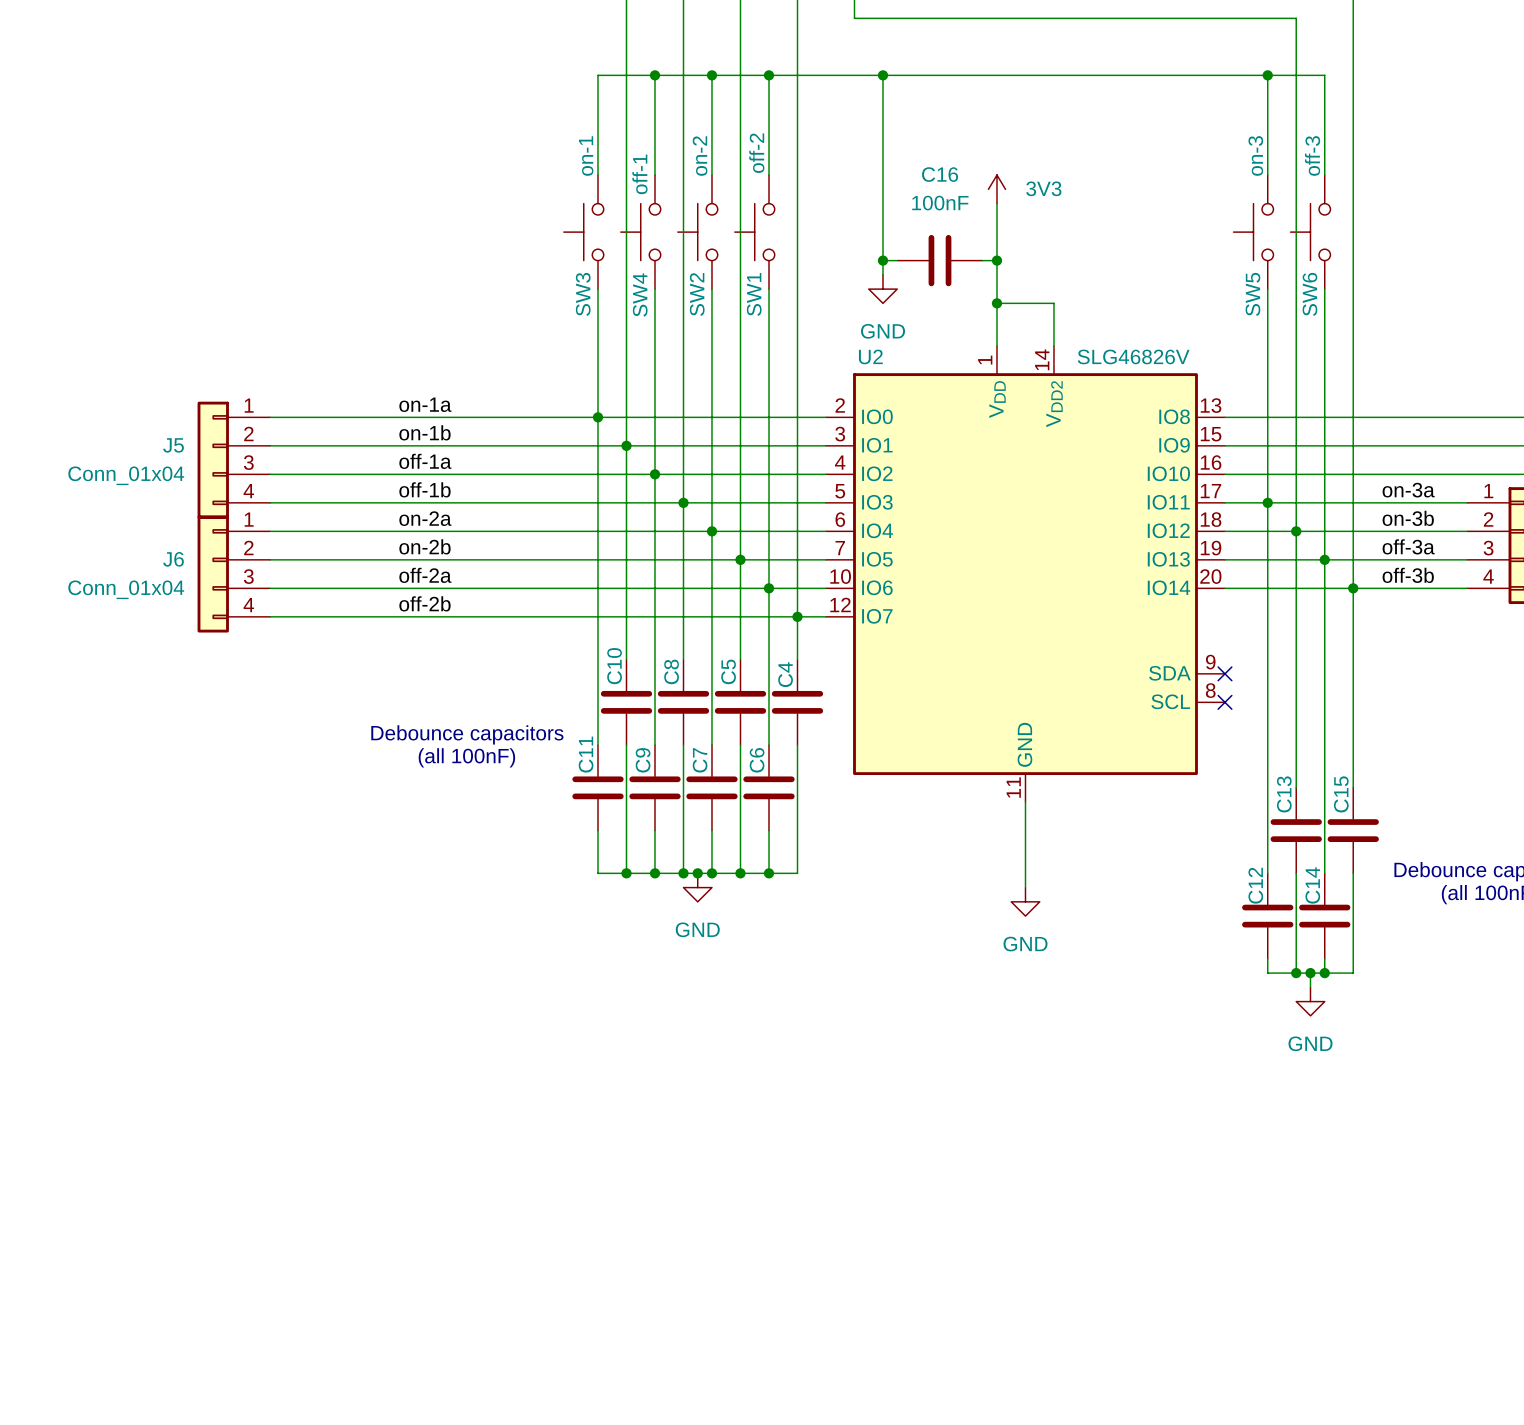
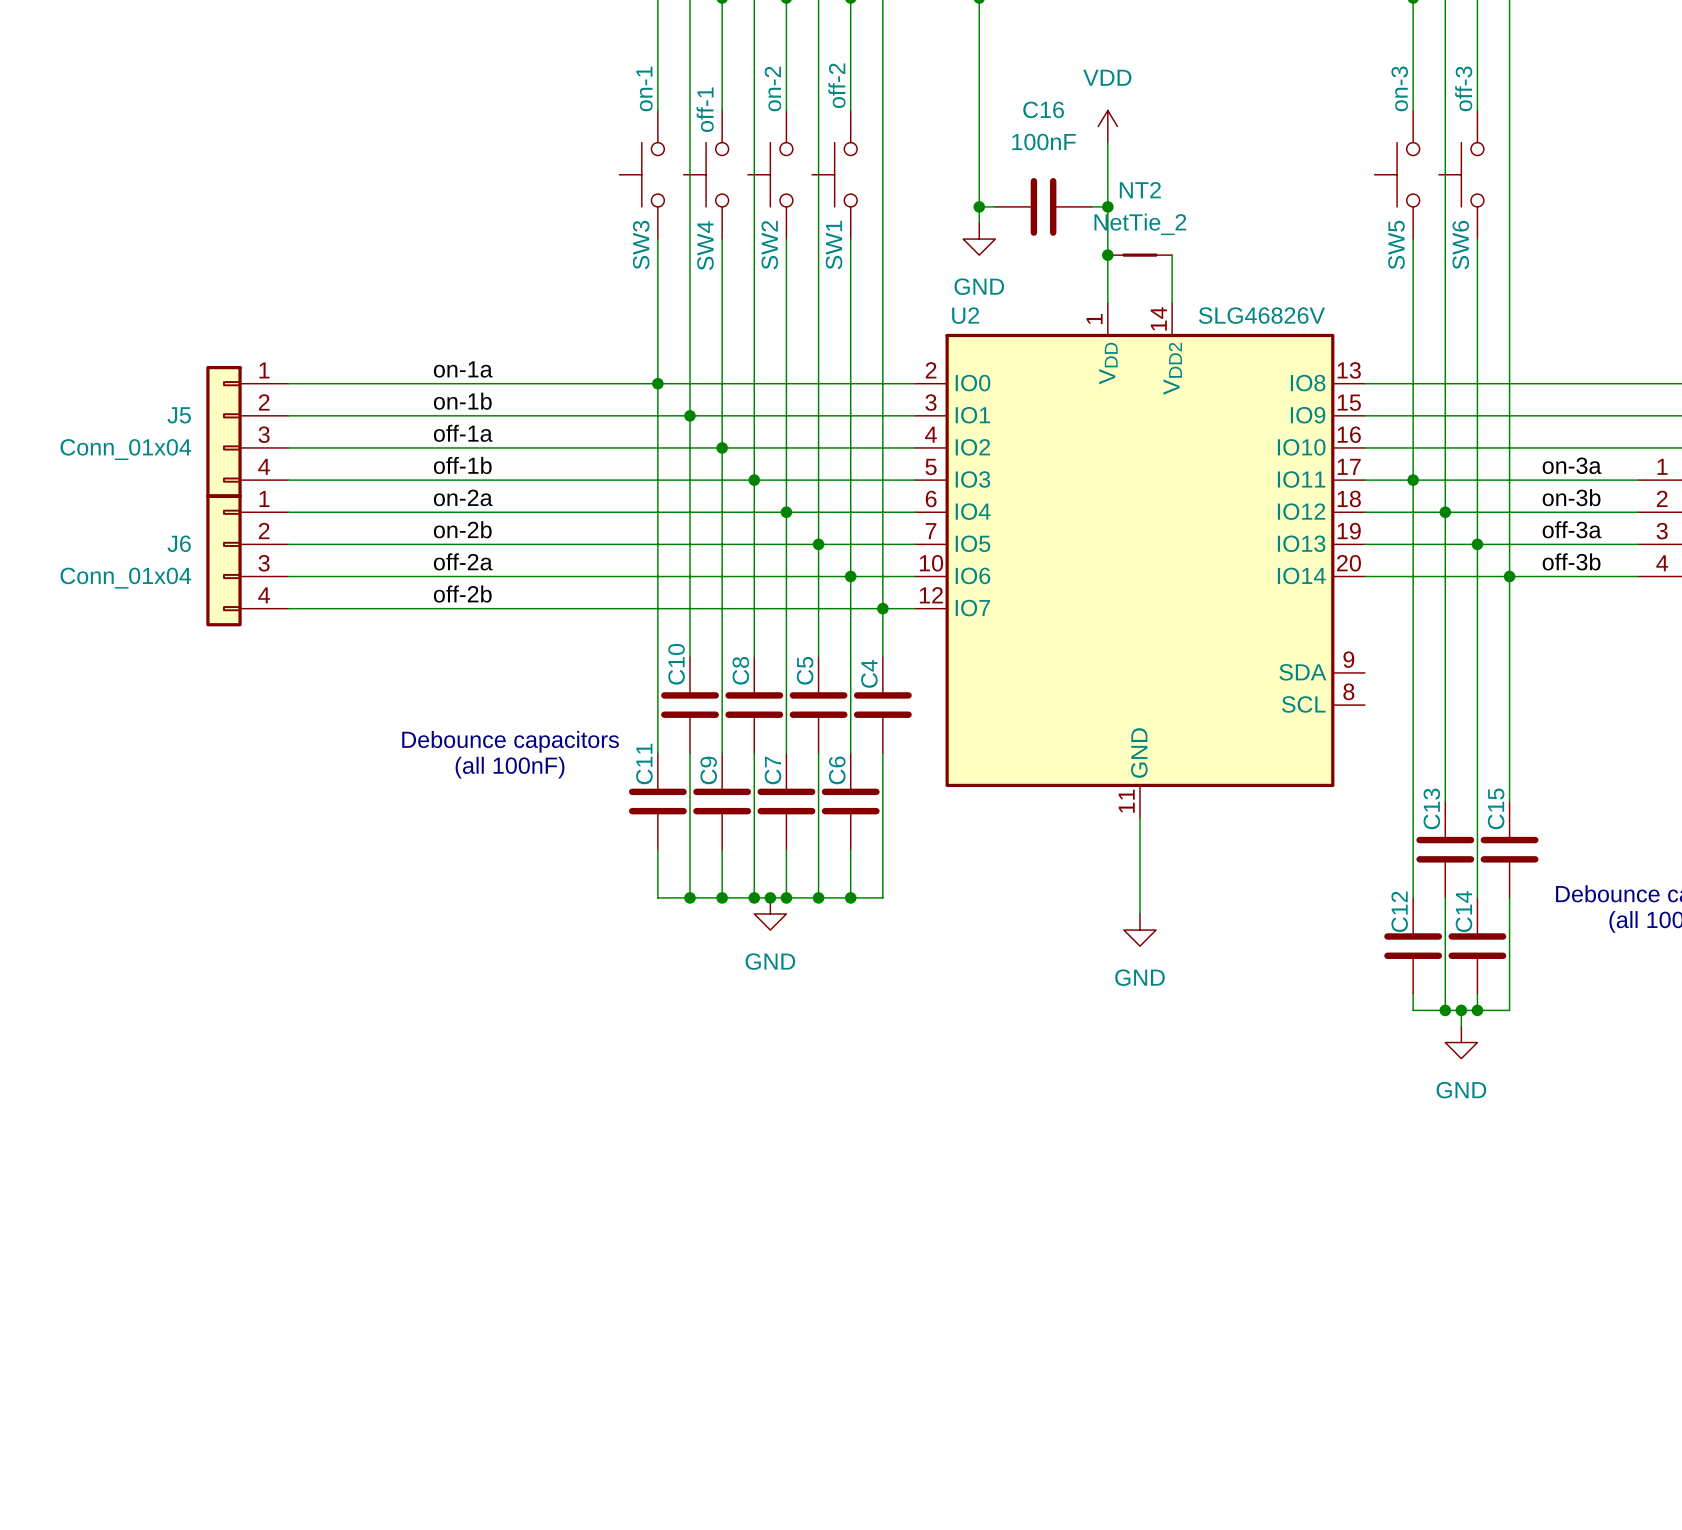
power symbol: 3V3 (996, 189) -> VDD (1107, 126)
NT2: none -> NetTie_2 (1139, 255)
no-connect mark: (1224, 673) -> none
no-connect mark: (1224, 702) -> none

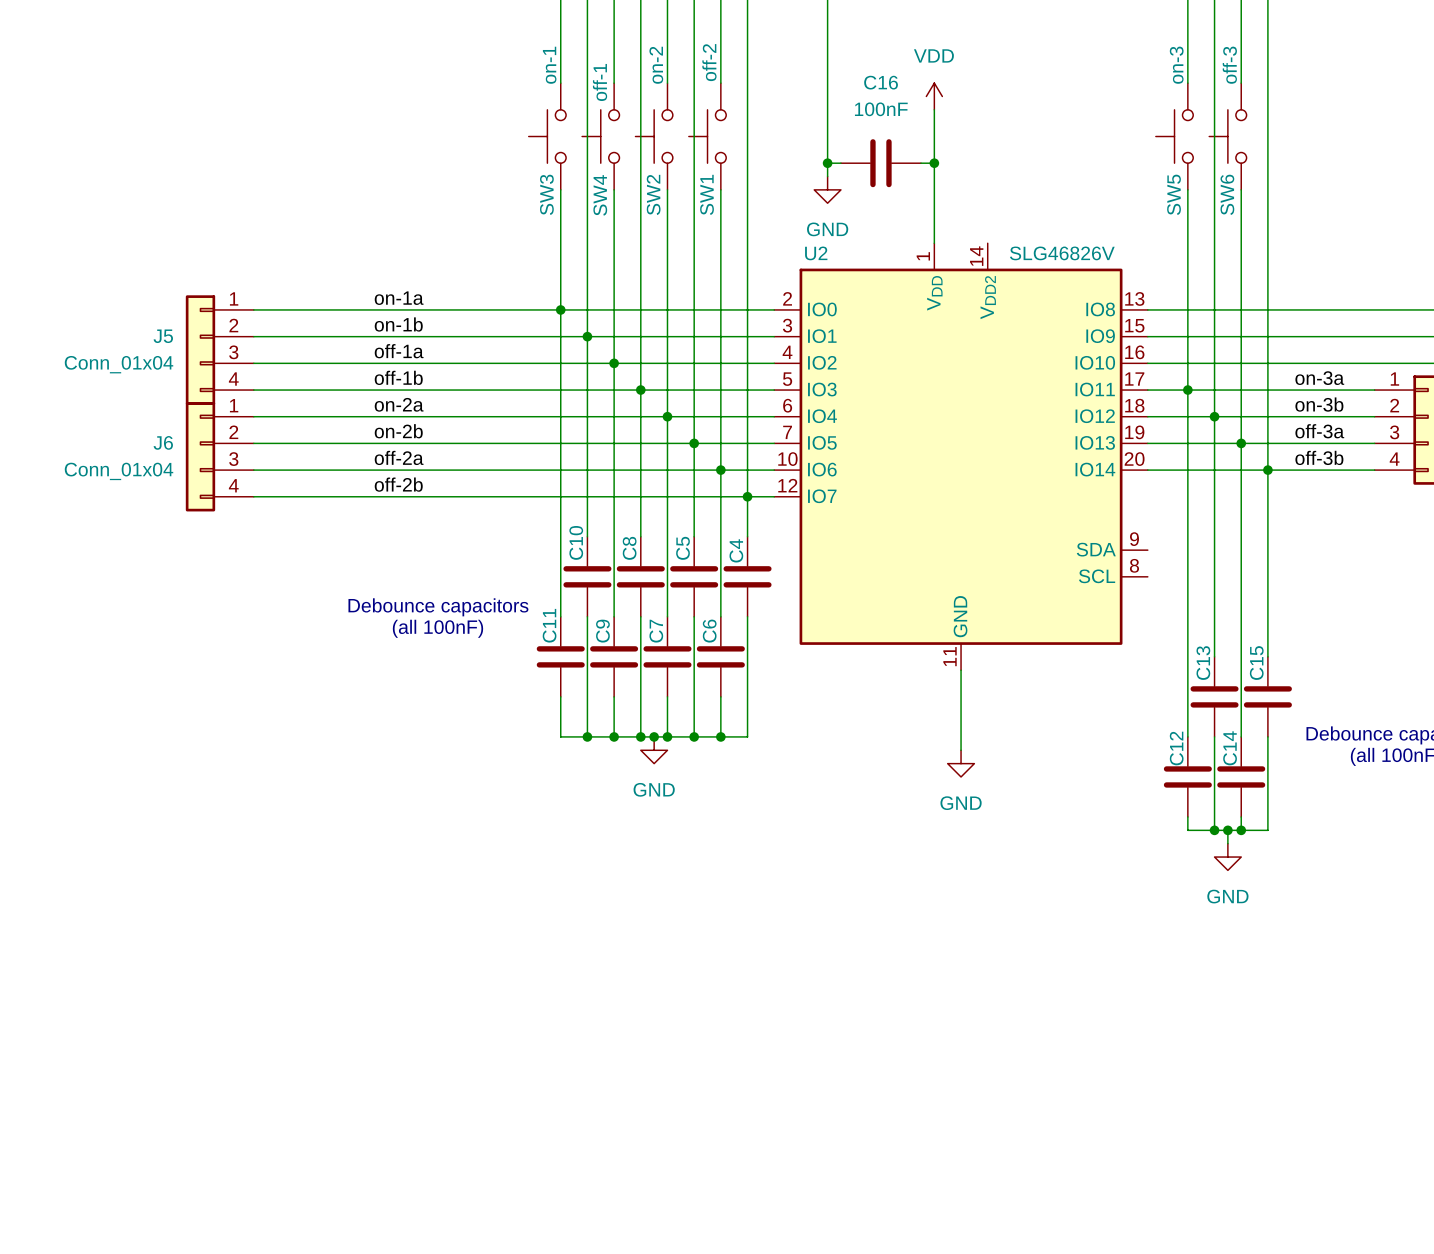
junction: (1107, 255) -> none
NT2: NetTie_2 (1139, 255) -> none
wire: (1172, 255) (1172, 303) -> none

